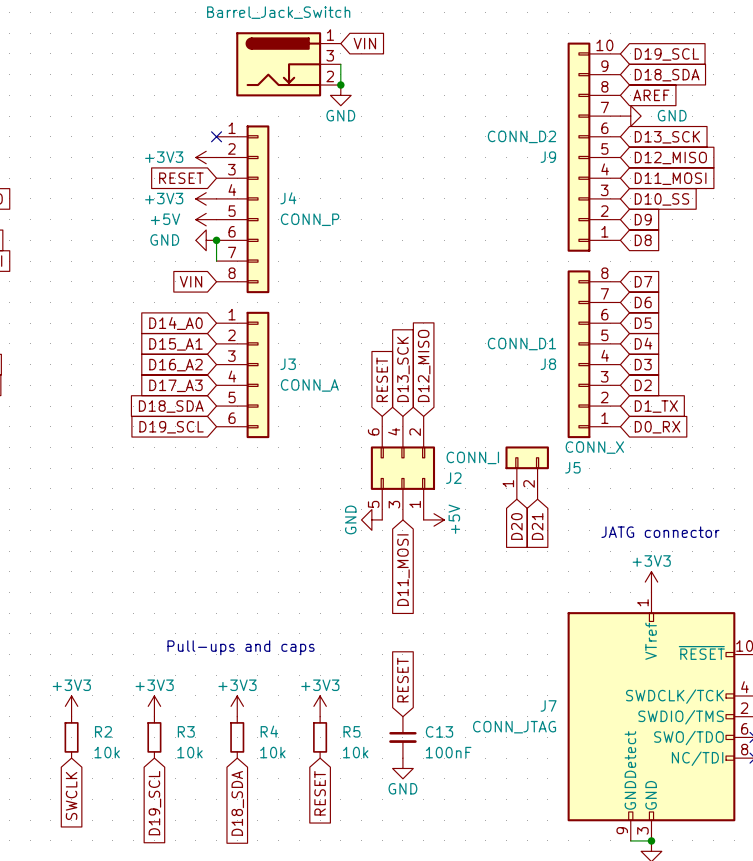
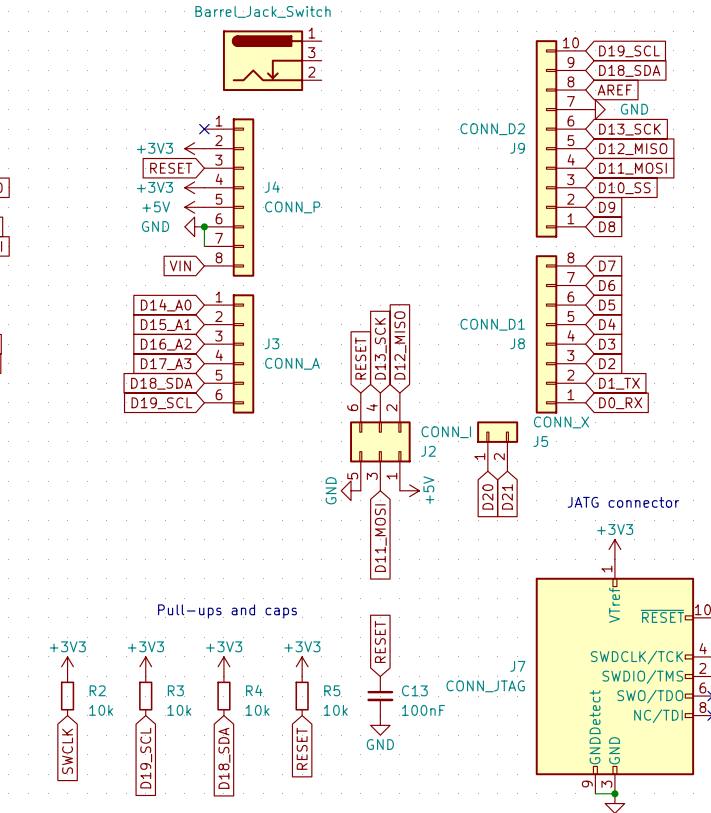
global label: VIN (364, 43) -> none
wire: (340, 64) (340, 85) -> none
junction: (340, 85) -> none
power symbol: GND (340, 95) -> none

